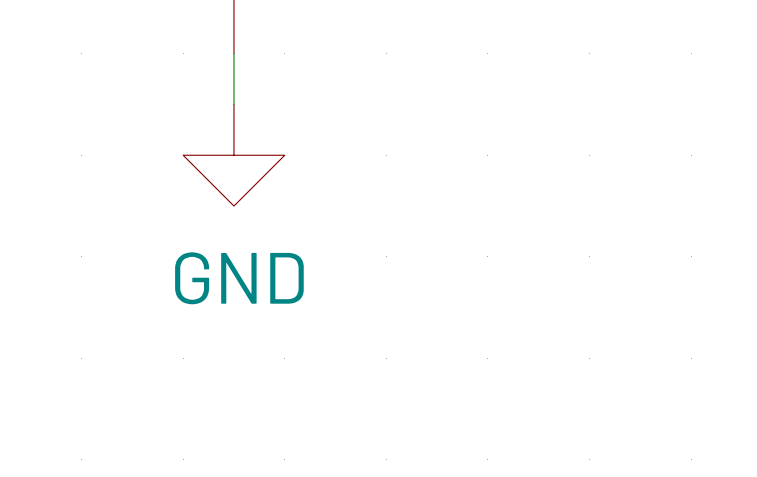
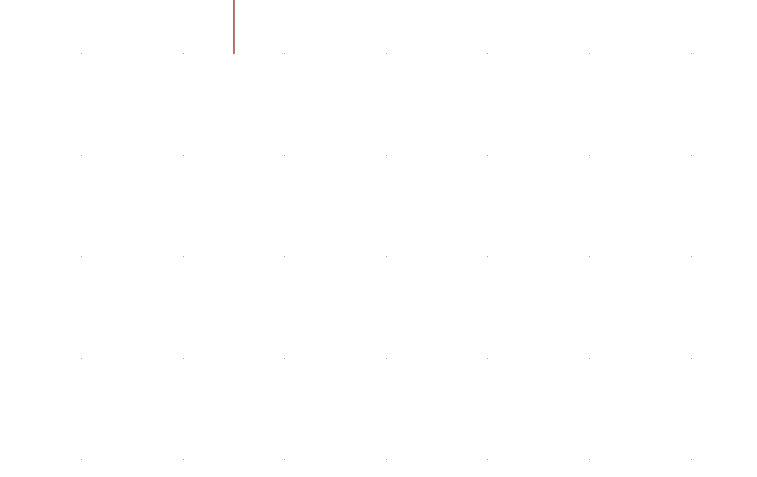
wire: (233, 53) (233, 104) -> none
power symbol: GND (233, 155) -> none

